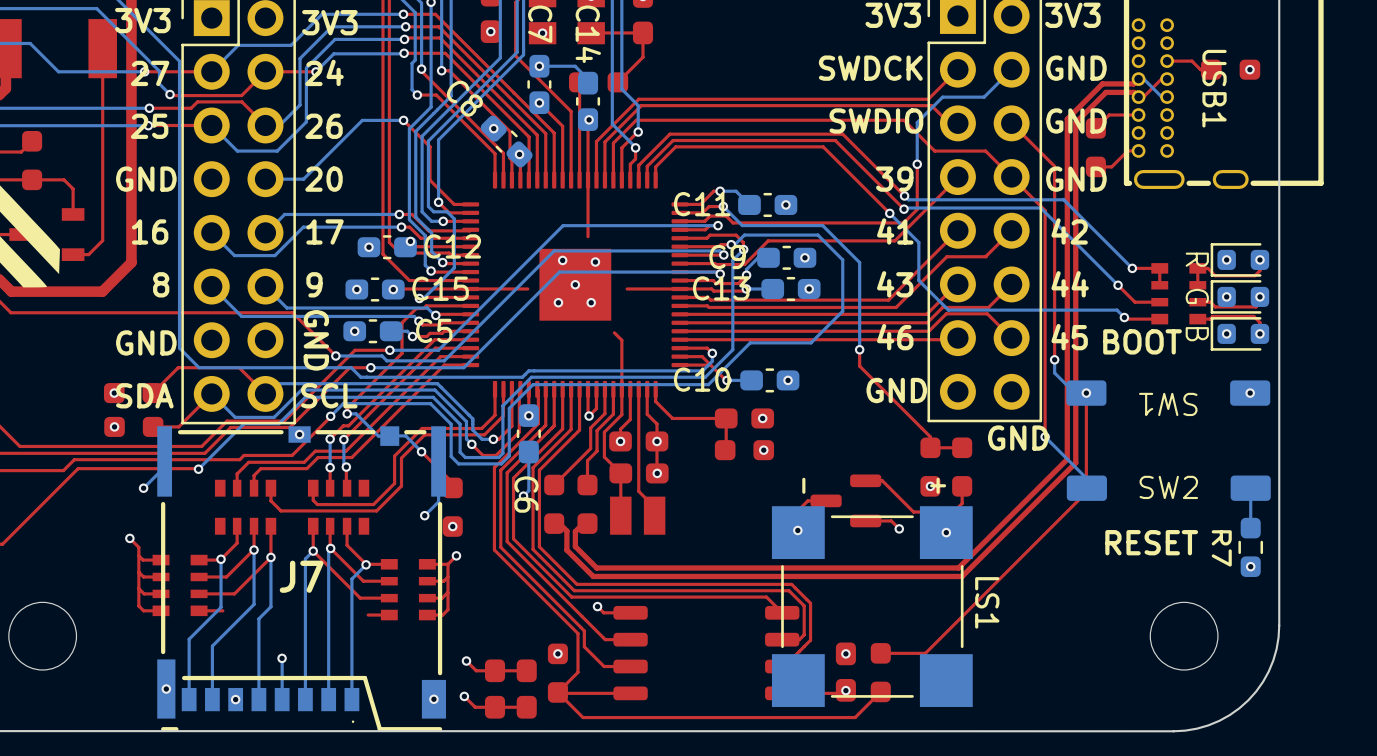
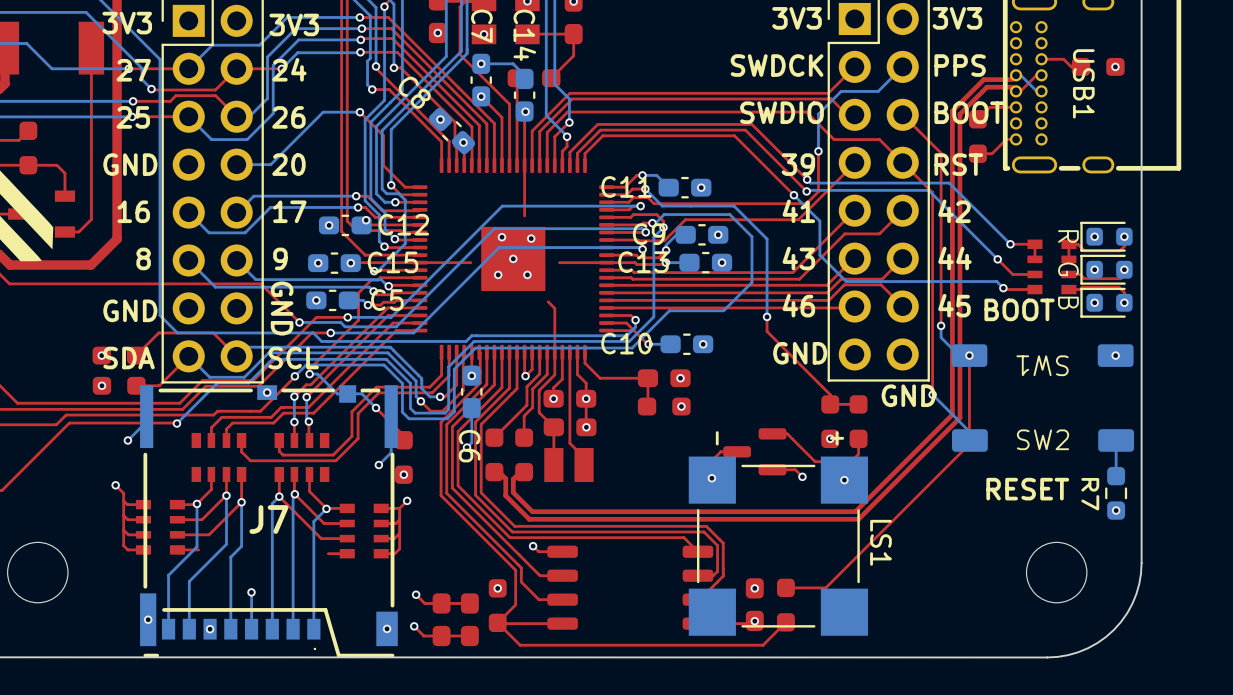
text: GND (1076, 68) -> PPS (960, 65)
text: GND (1076, 120) -> BOOT (969, 112)
text: GND (1076, 179) -> RST (958, 164)

